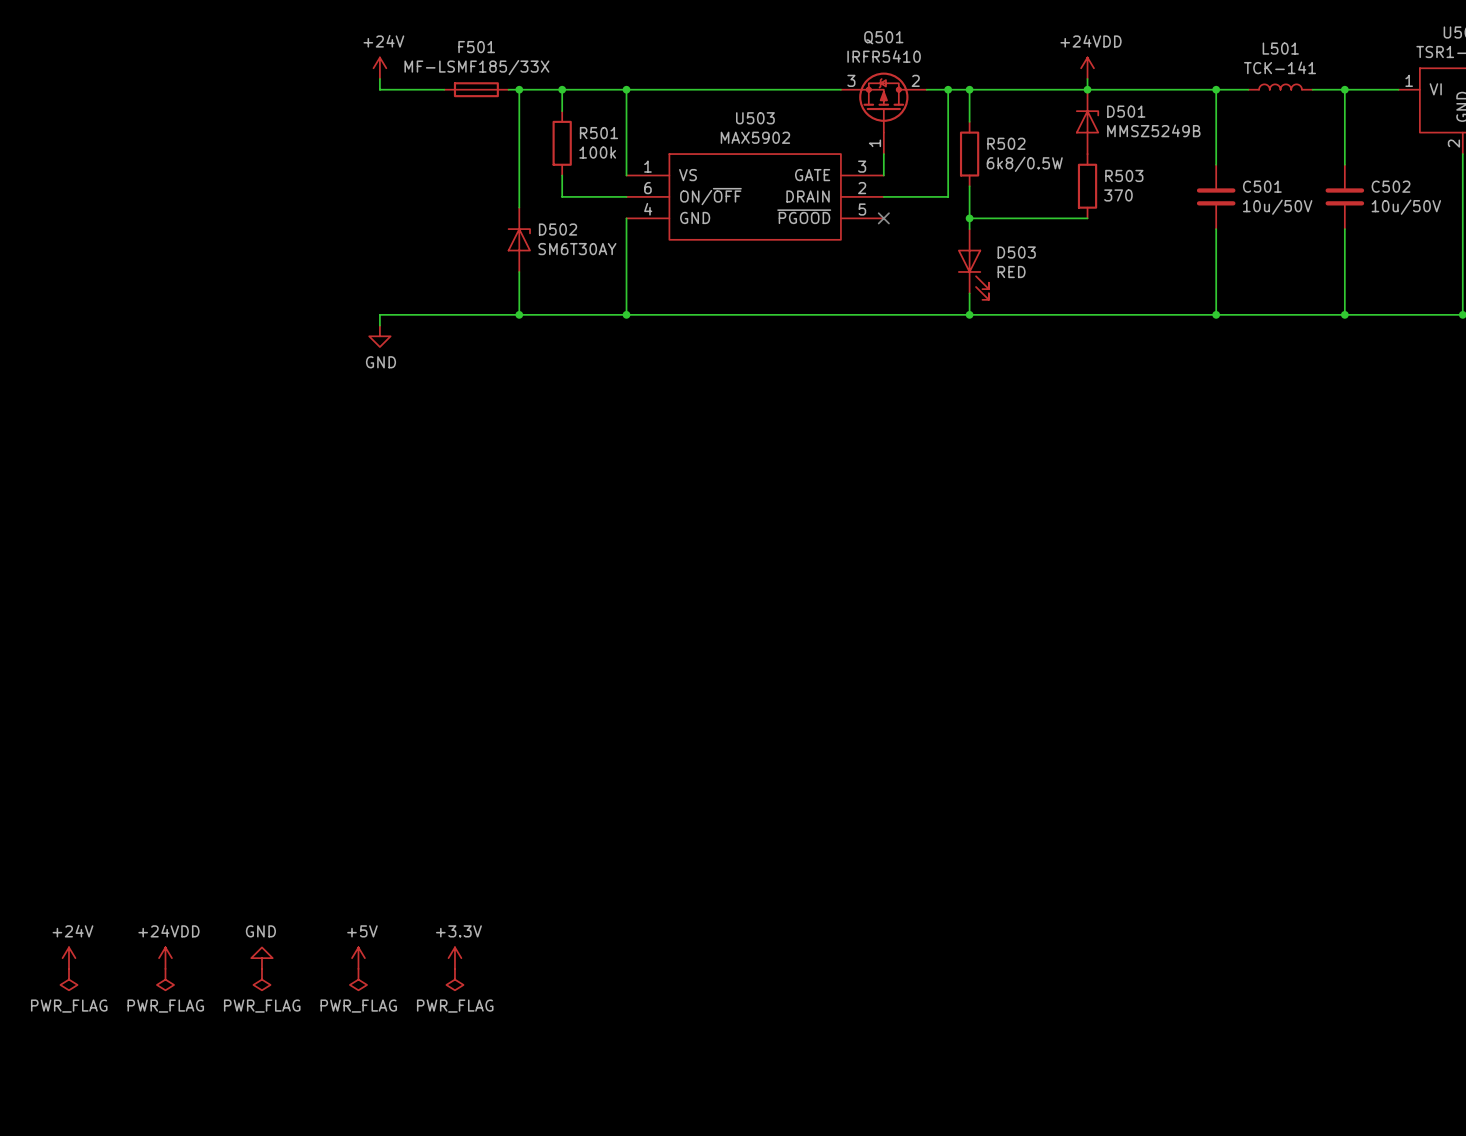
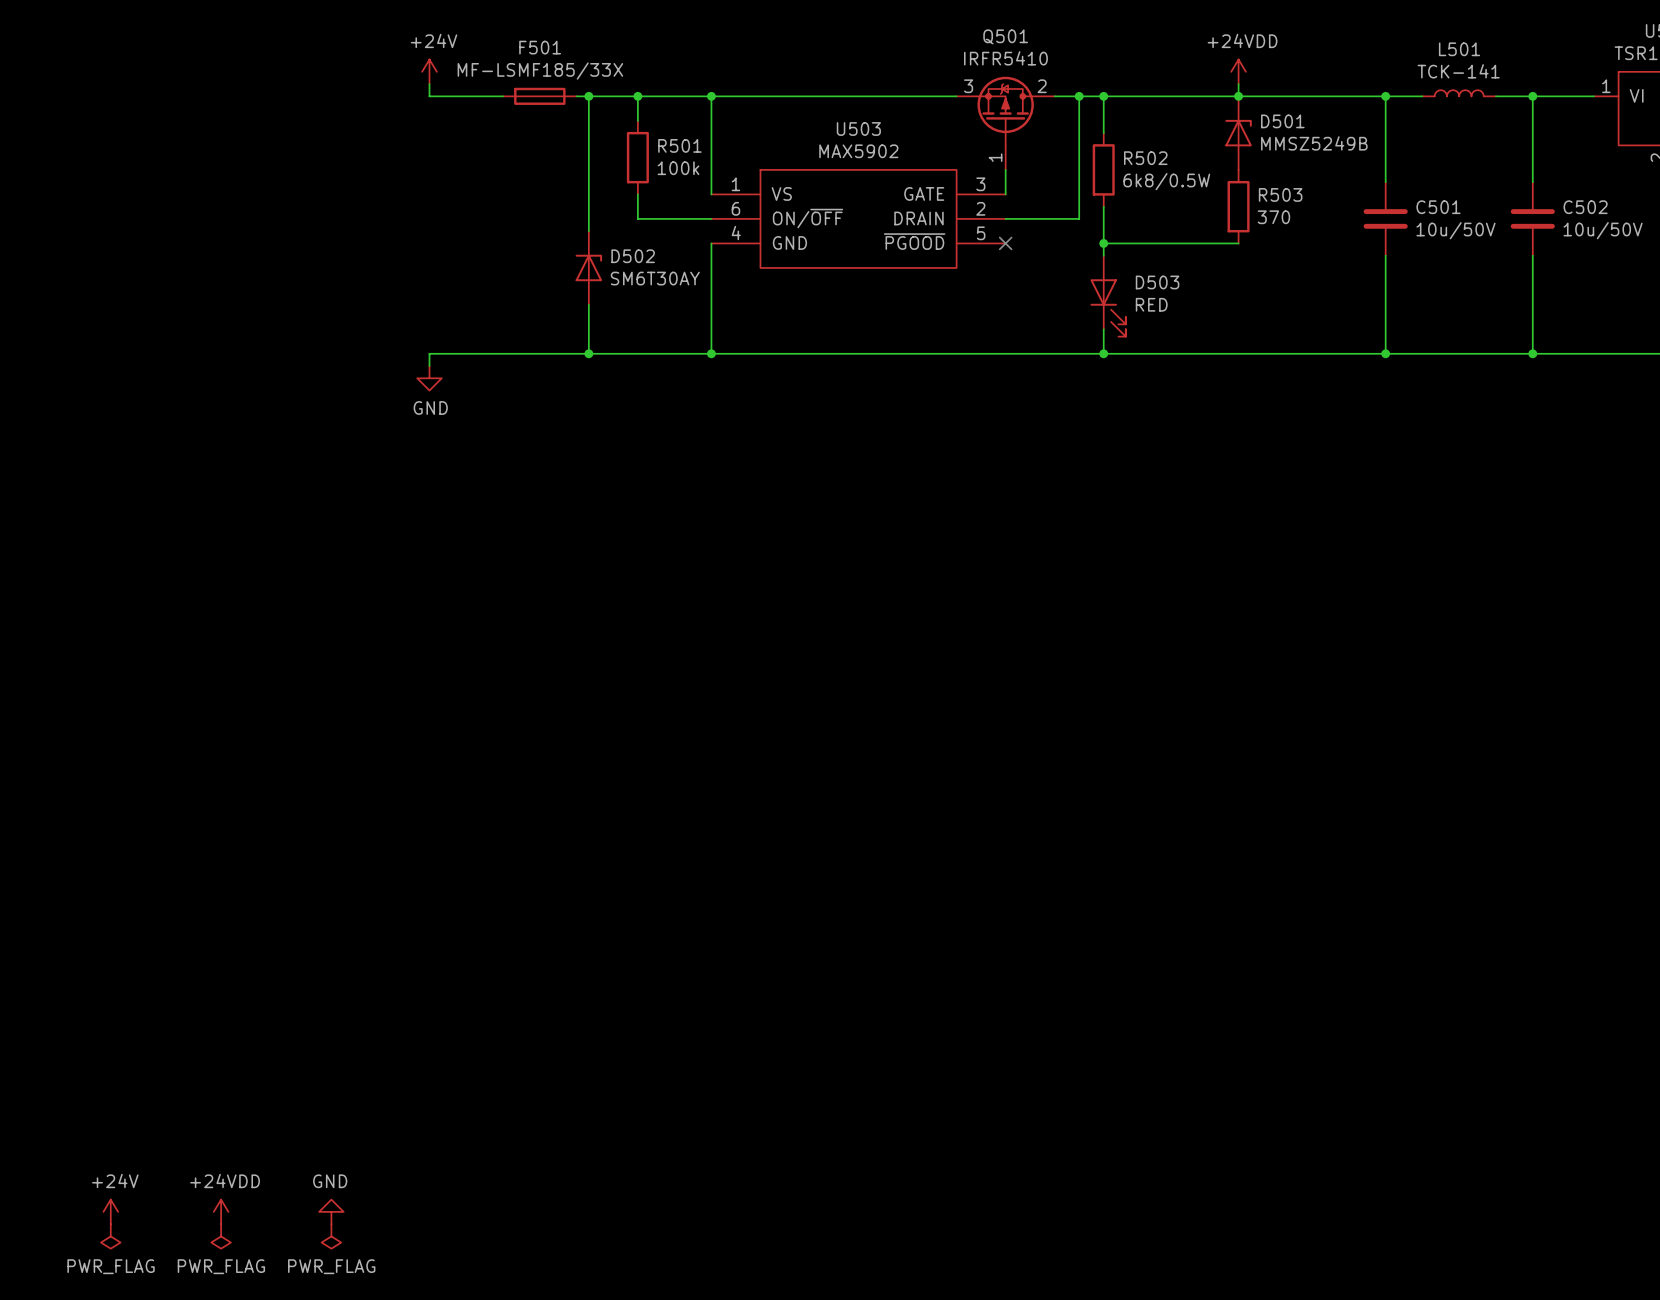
power symbol position: +24V (69, 958) -> +24V (110, 1211)
power symbol position: +24VDD (165, 958) -> +24VDD (221, 1211)
power symbol position: GND (261, 958) -> GND (331, 1211)
power symbol: +5V (358, 958) -> none
power symbol: +3.3V (454, 958) -> none
power symbol: PWR_FLAG (69, 979) -> none
power symbol: PWR_FLAG (165, 979) -> none
power symbol: PWR_FLAG (261, 979) -> none
power symbol: PWR_FLAG (358, 979) -> none
power symbol: PWR_FLAG (454, 979) -> none
power symbol: none -> PWR_FLAG (110, 1236)
power symbol: none -> PWR_FLAG (221, 1236)
power symbol: none -> PWR_FLAG (331, 1236)

